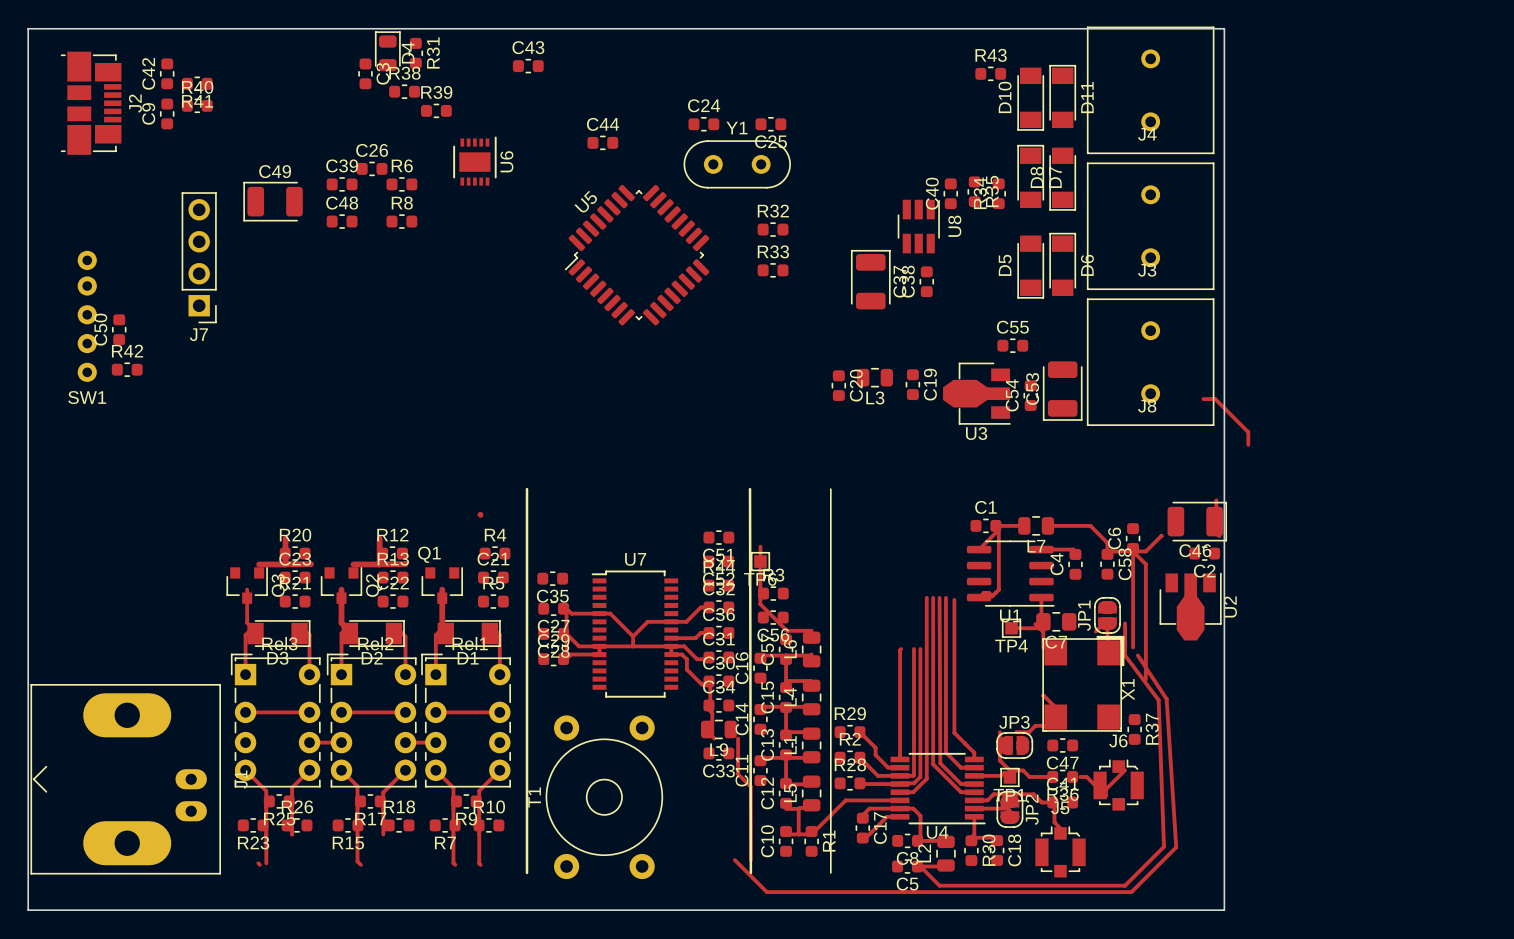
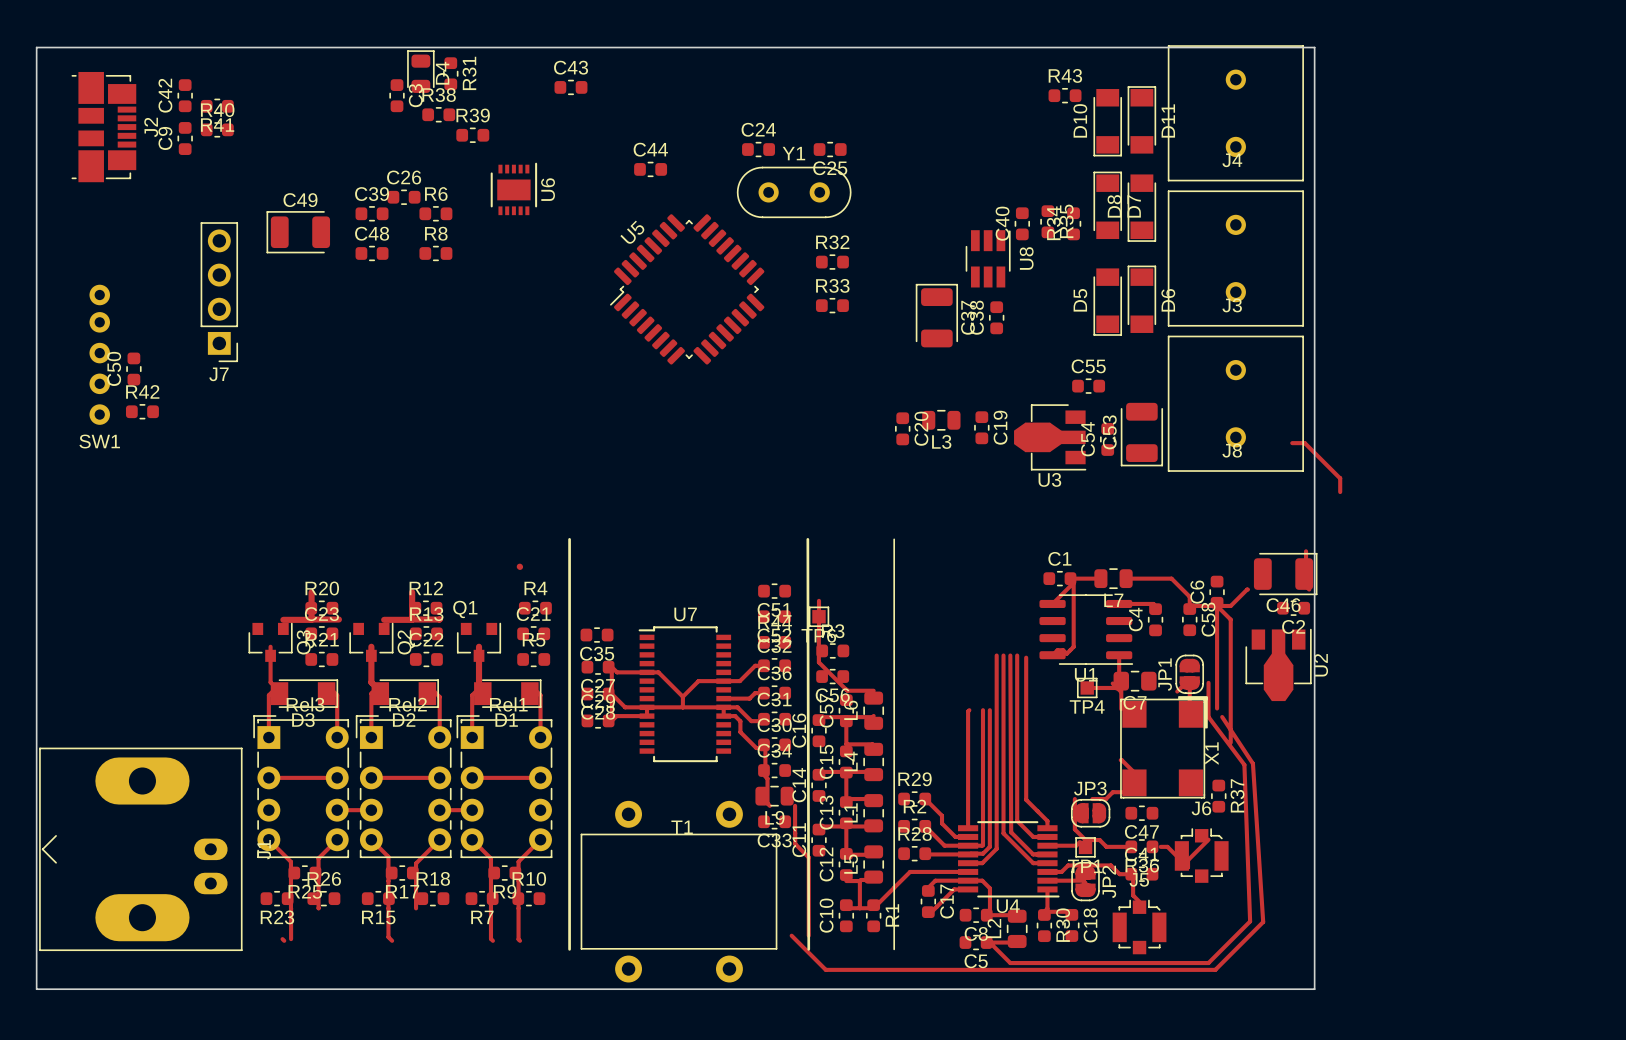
T1 footprint: [545, 715, 664, 880] -> [580, 800, 778, 983]
T1 name position: T1 (534, 797) -> T1 (682, 827)

